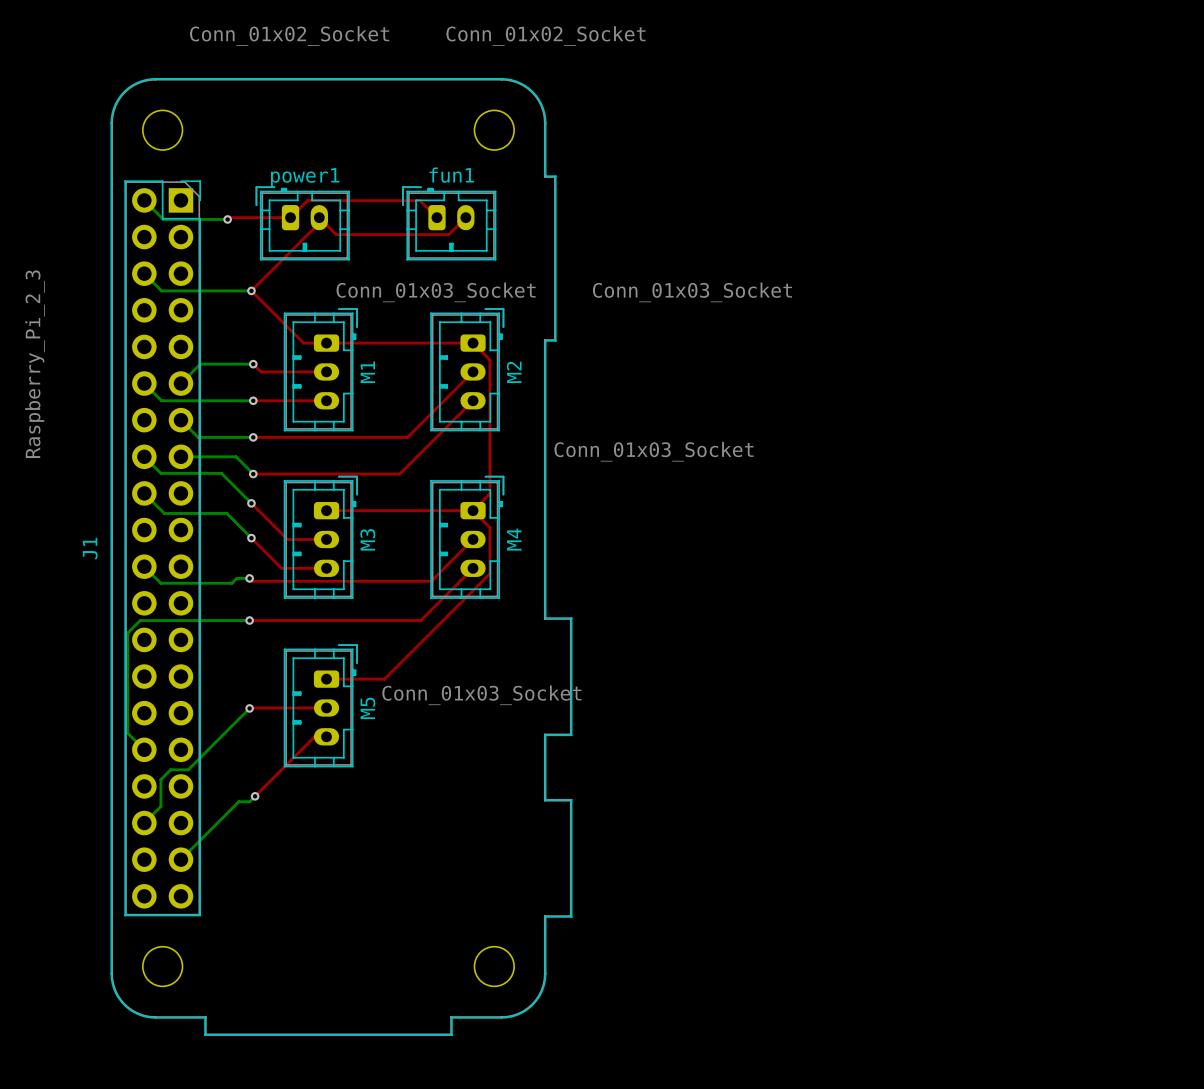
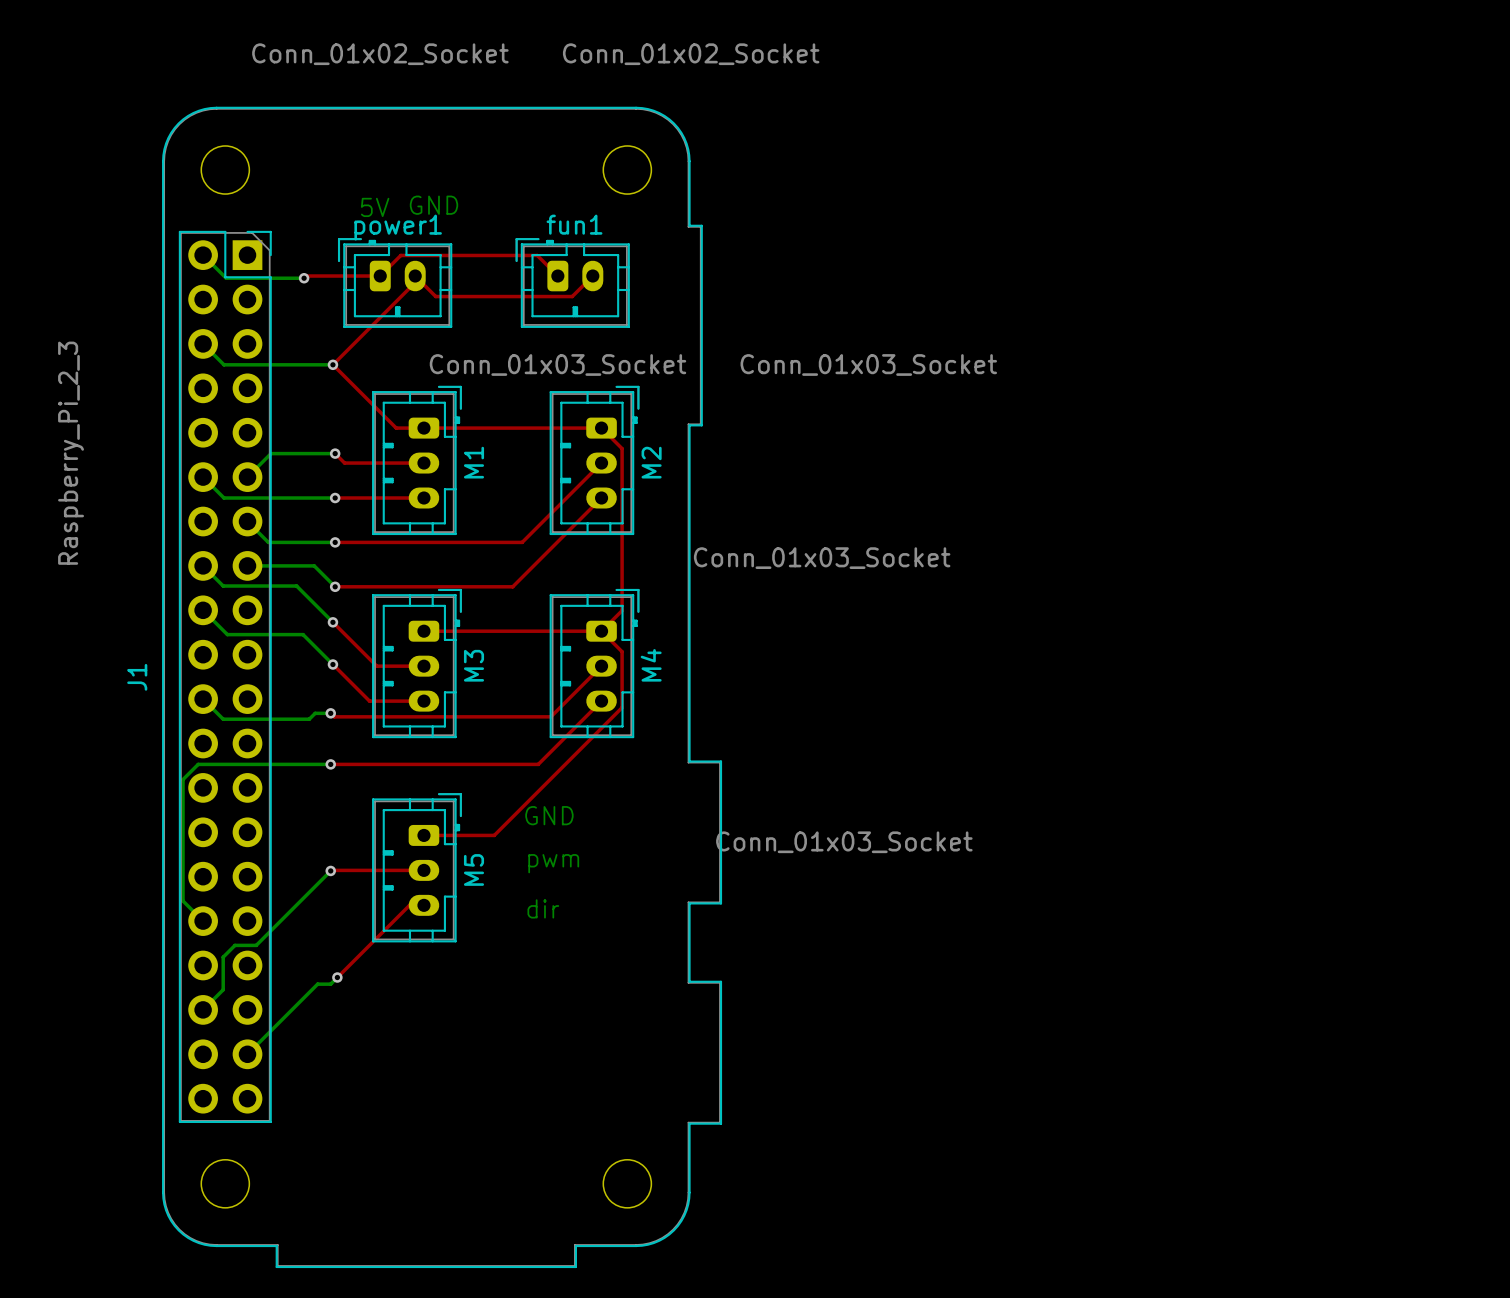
text: none -> GND (433, 205)
text: none -> 5V (375, 207)
text: none -> GND (549, 815)
M5 value position: Conn_01x03_Socket (481, 695) -> Conn_01x03_Socket (844, 842)
text: none -> pwm (553, 863)
text: none -> dir (543, 908)

